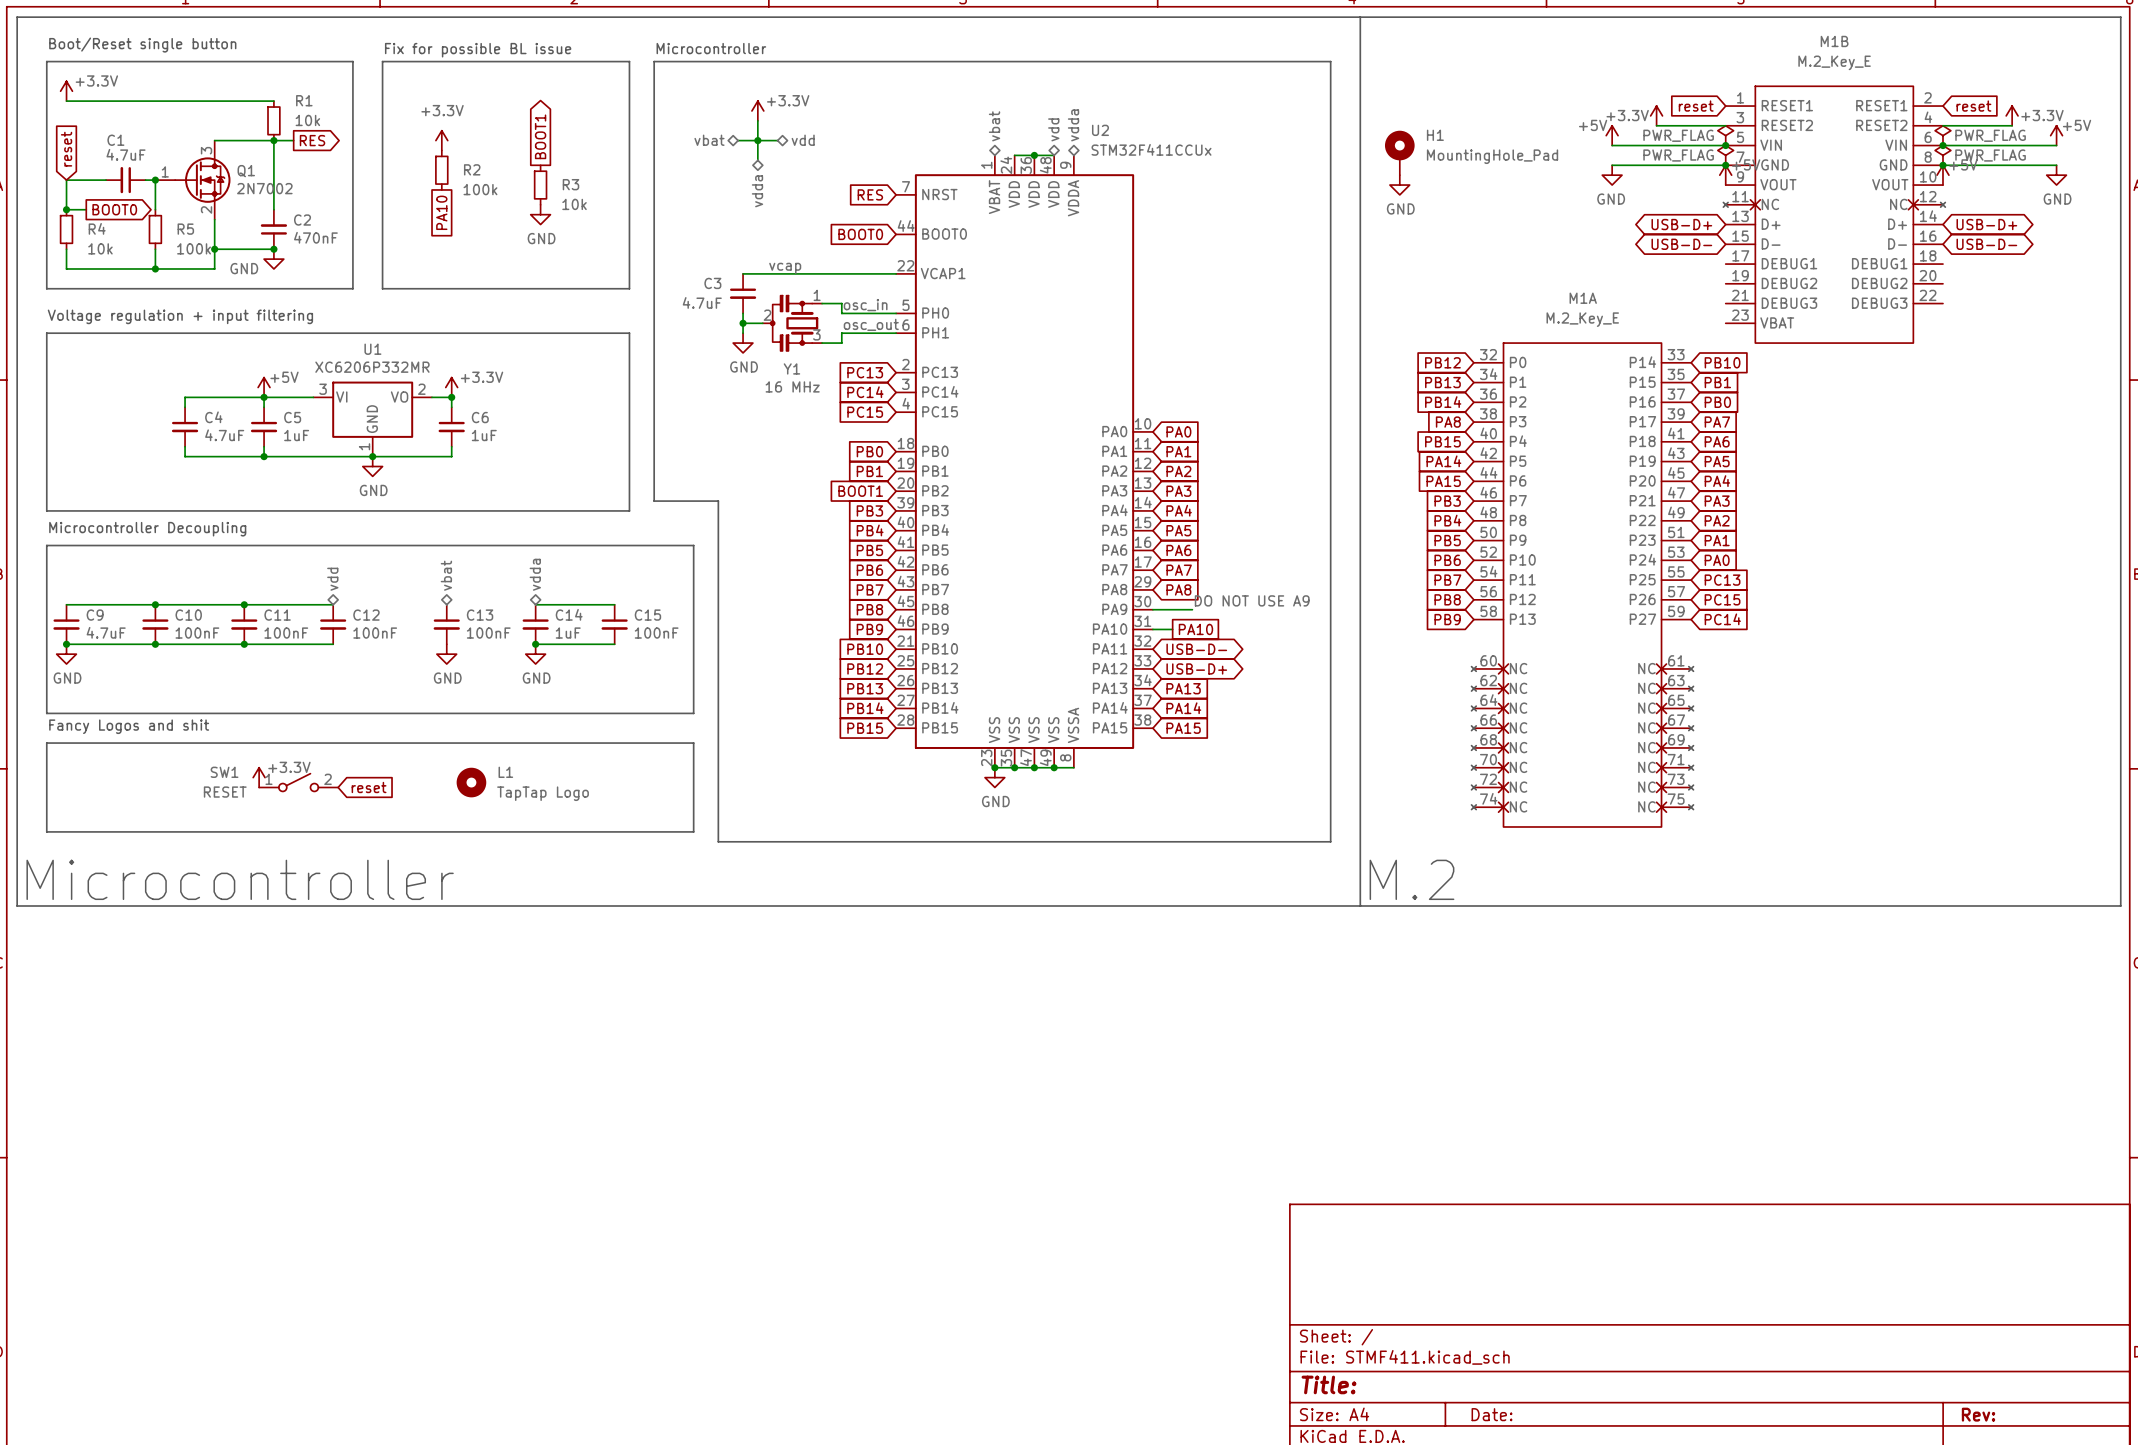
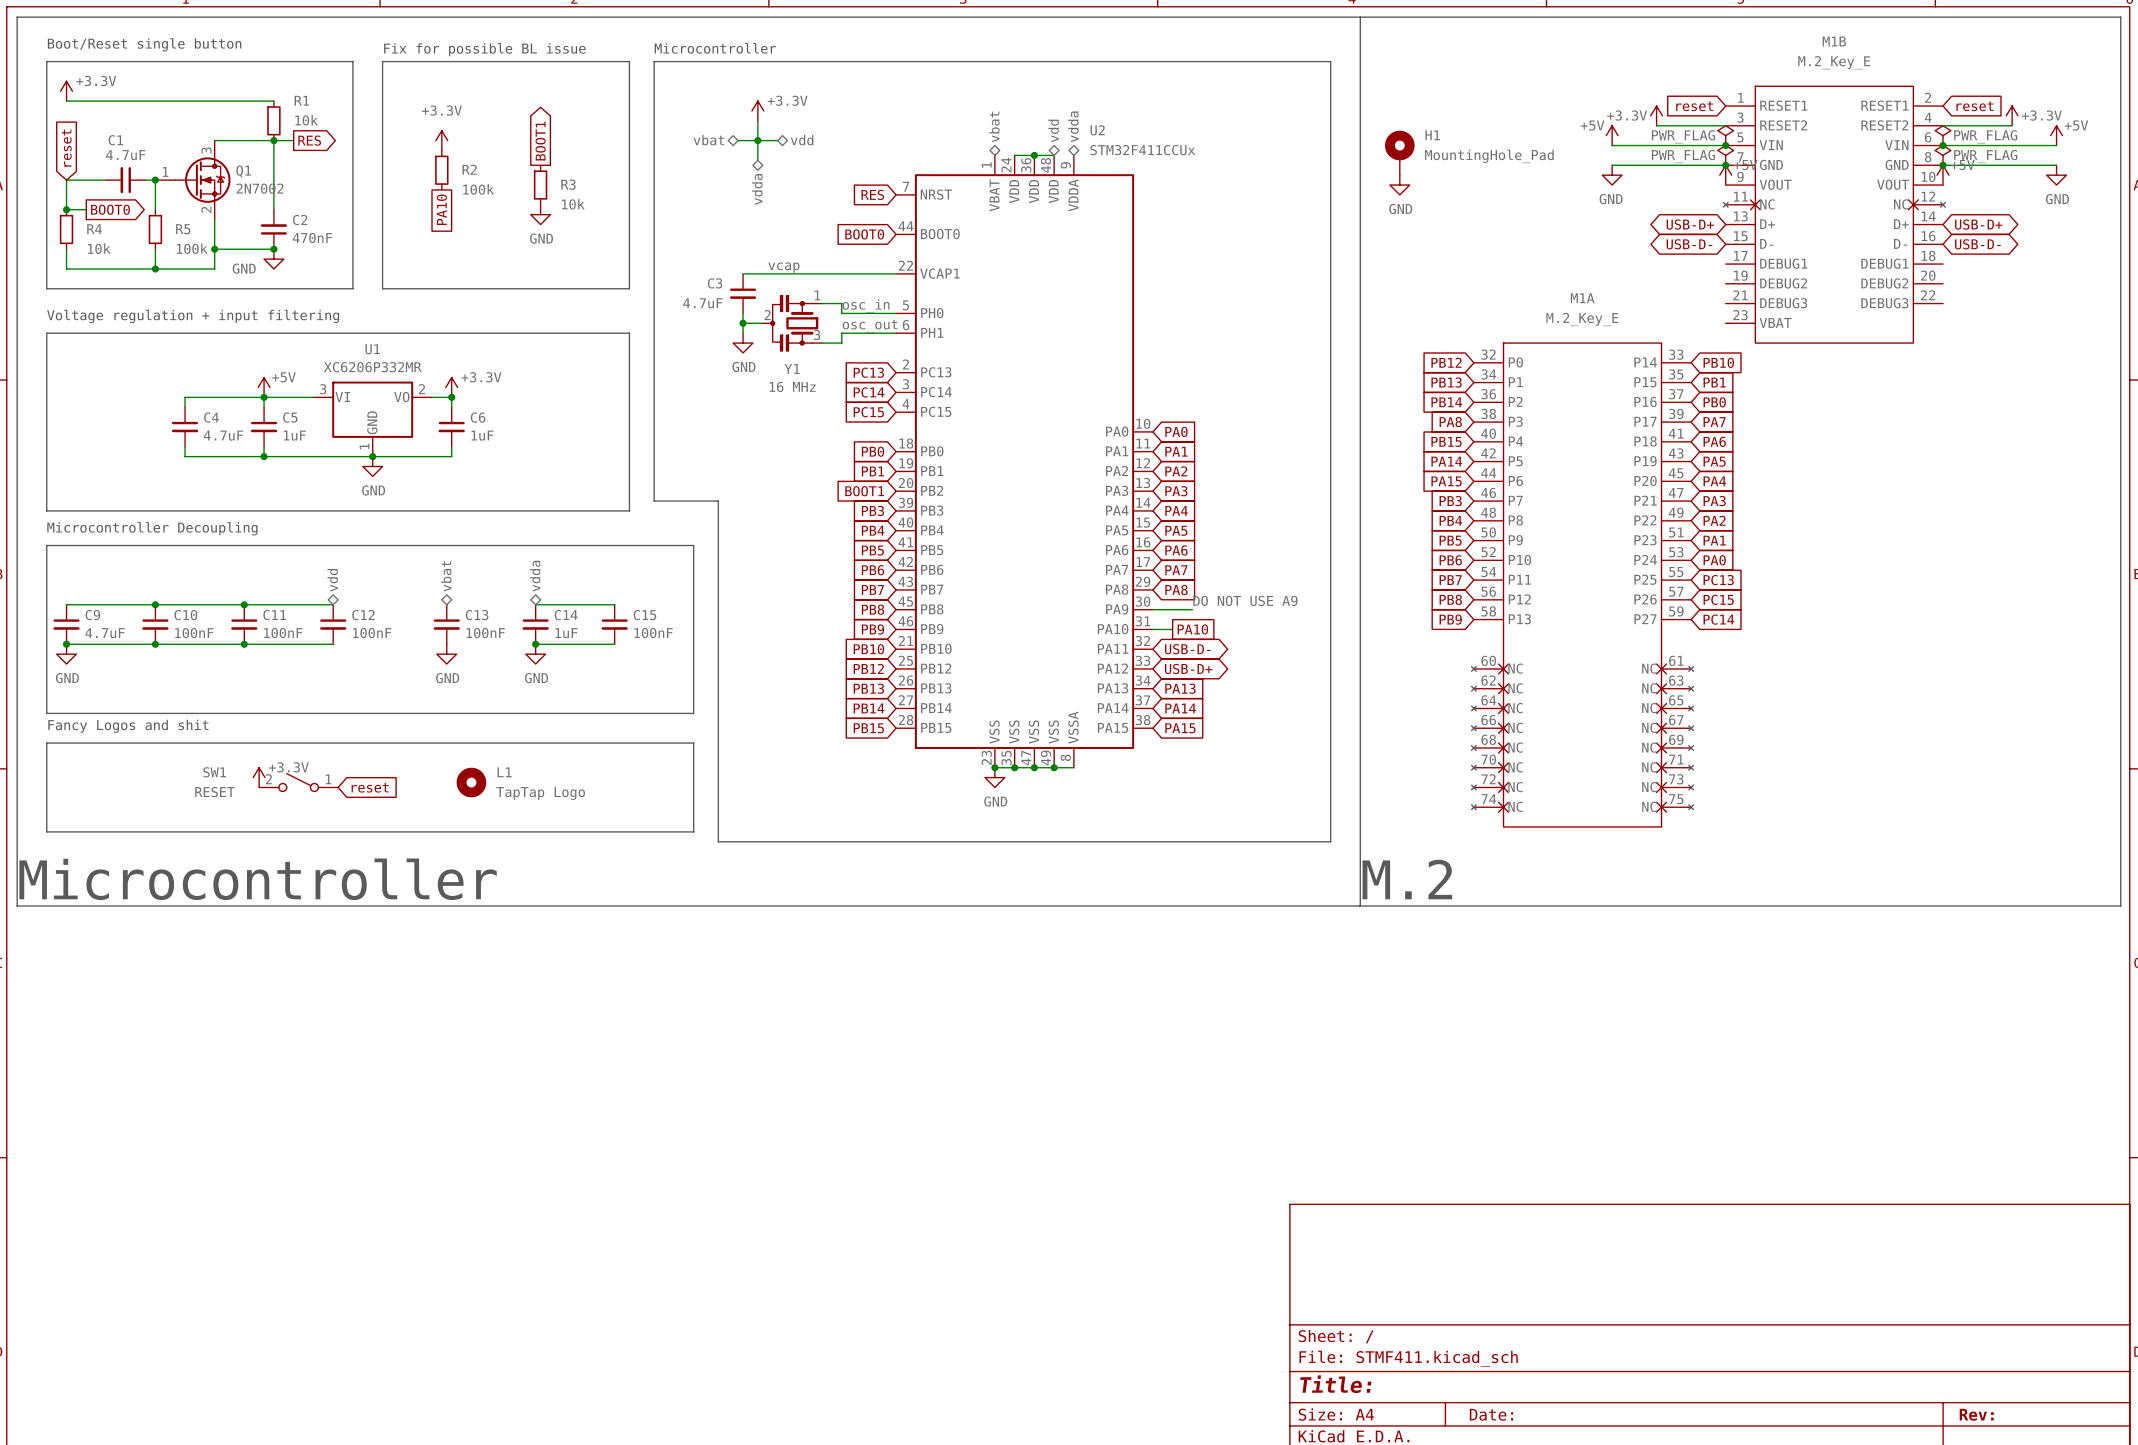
SW1 flip: as is (298, 782) -> left-right (298, 782)

